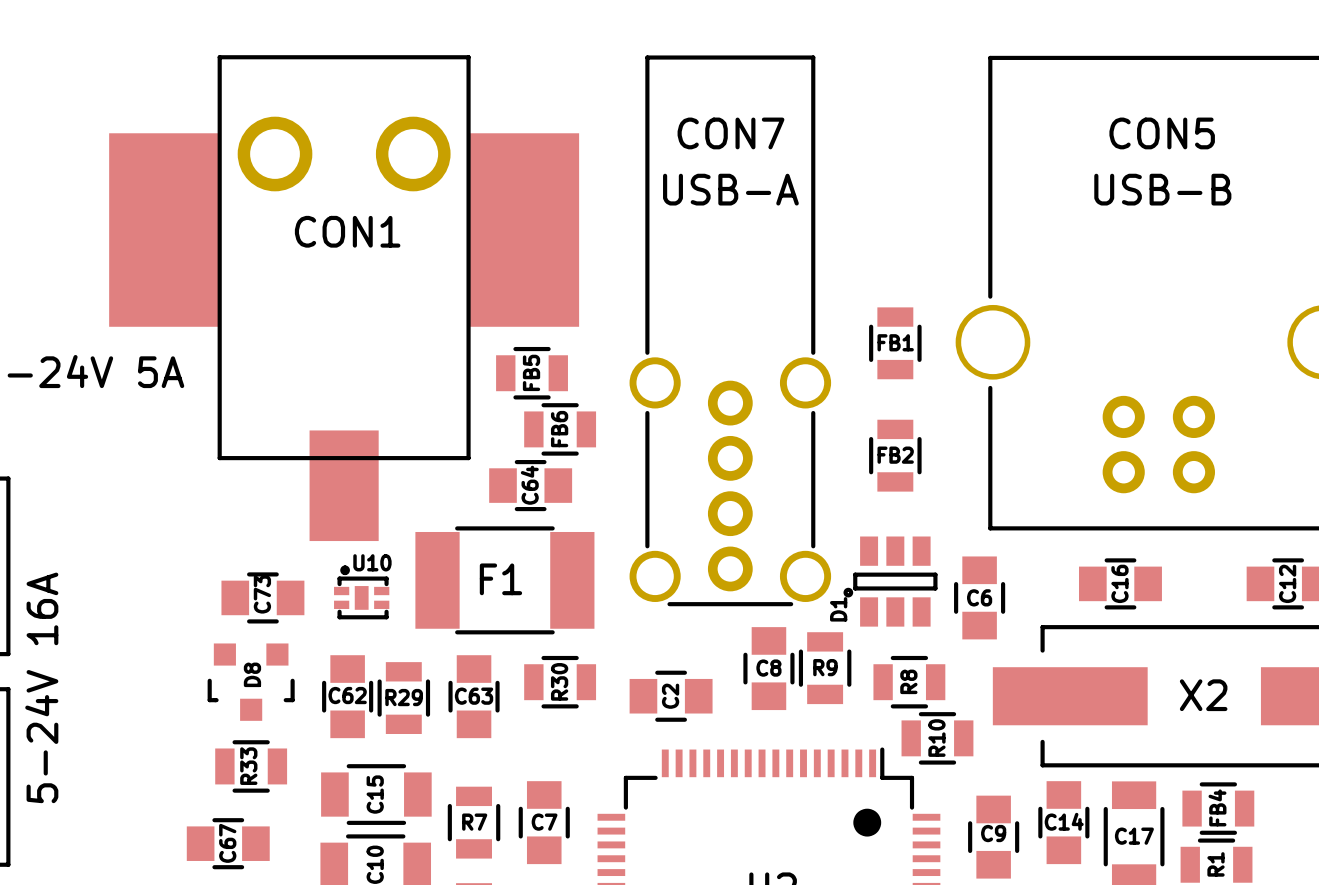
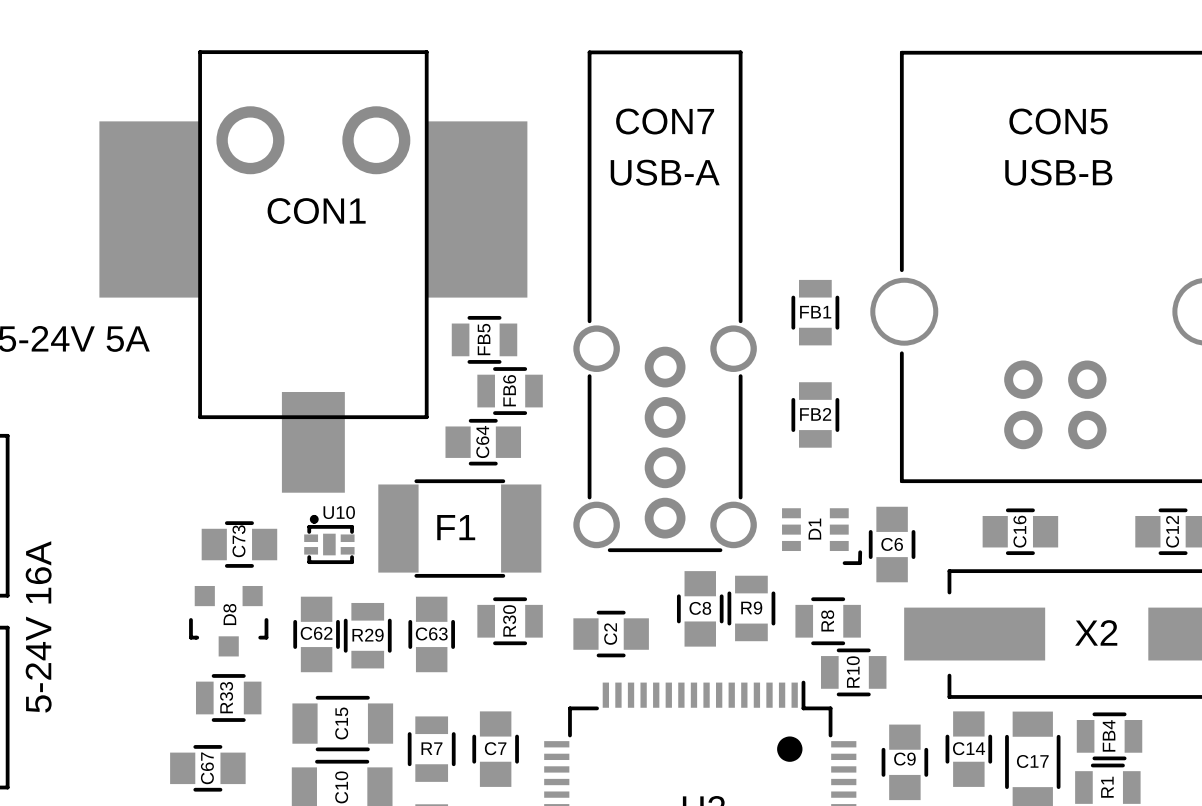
D1 footprint: [843, 536, 938, 627] -> [782, 508, 863, 566]
D1 name position: D1 (838, 609) -> D1 (814, 529)

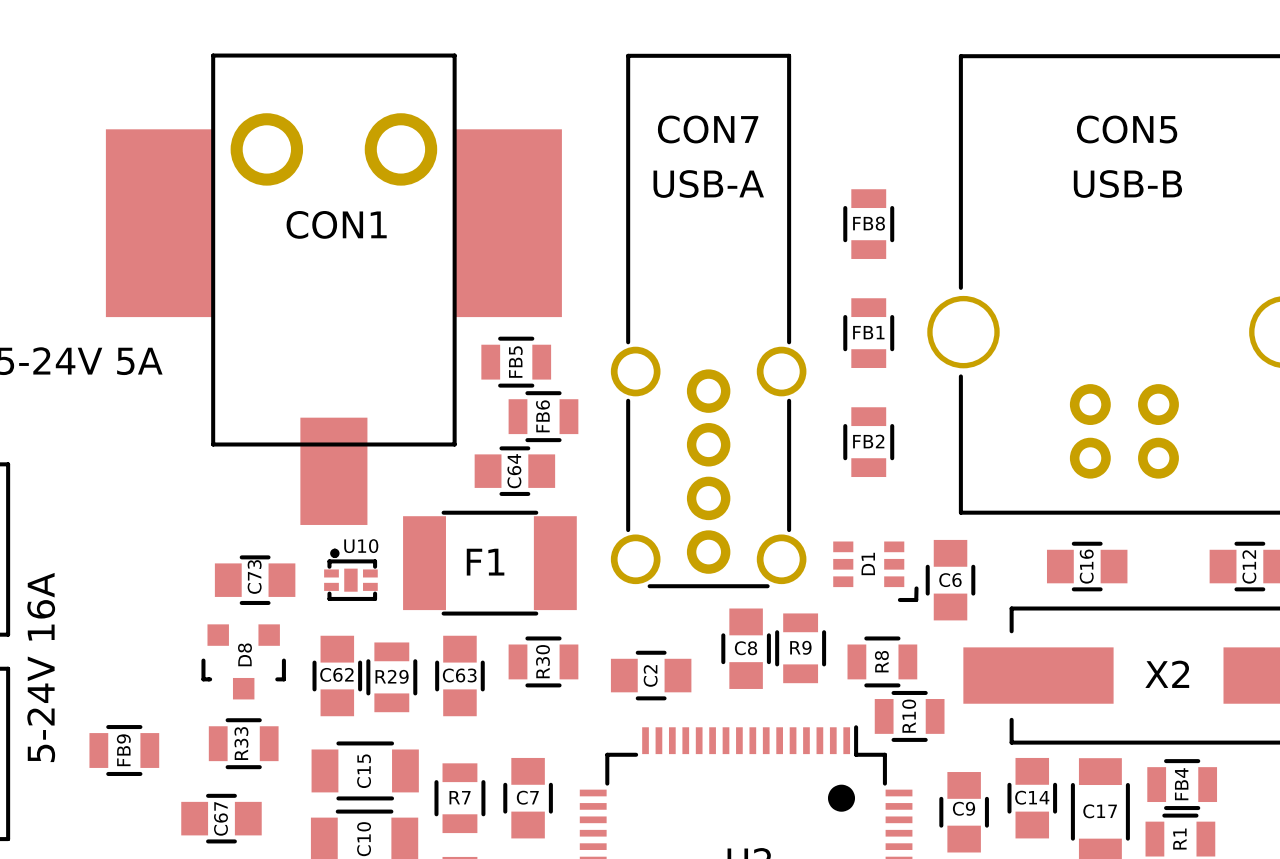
FB8: none -> (868, 224)
FB9: none -> (124, 750)

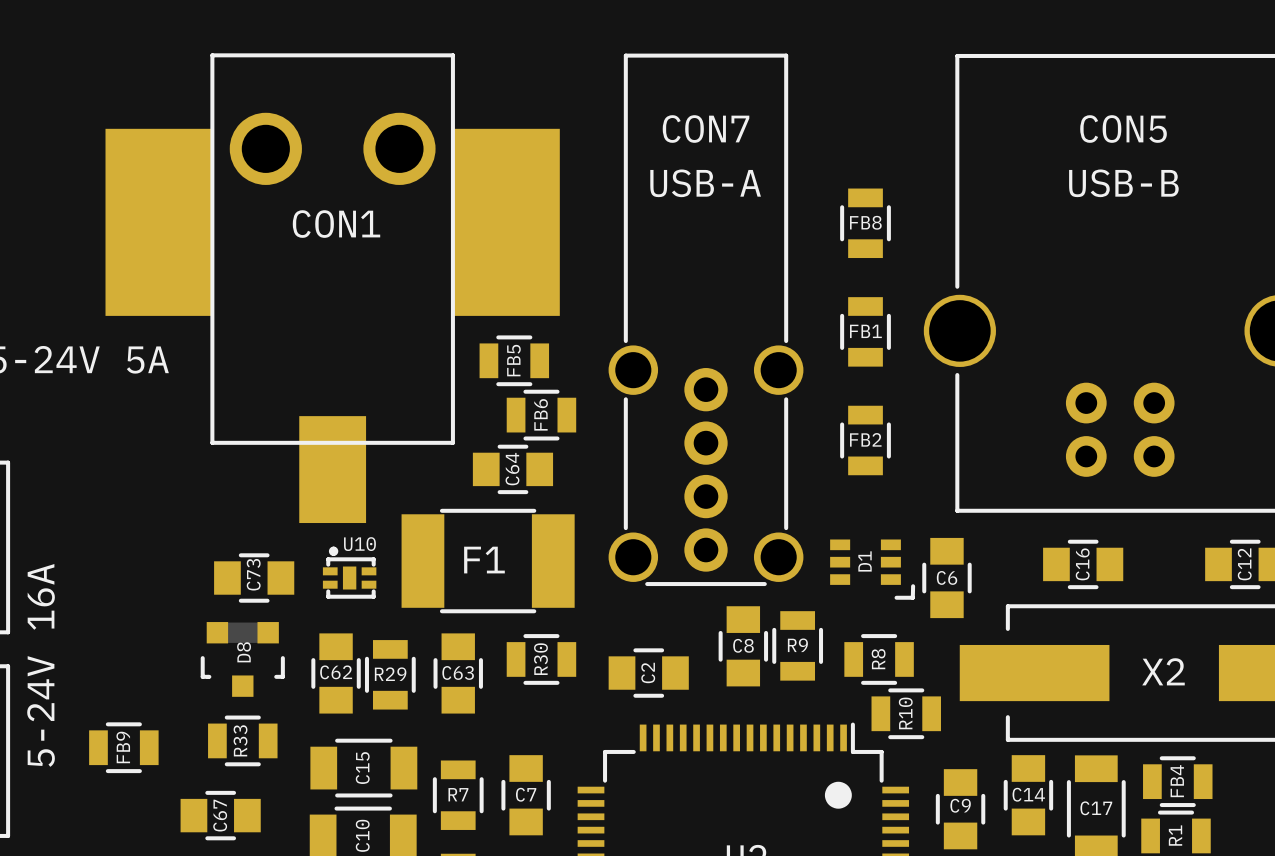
track: none -> (217, 632) (268, 632)

